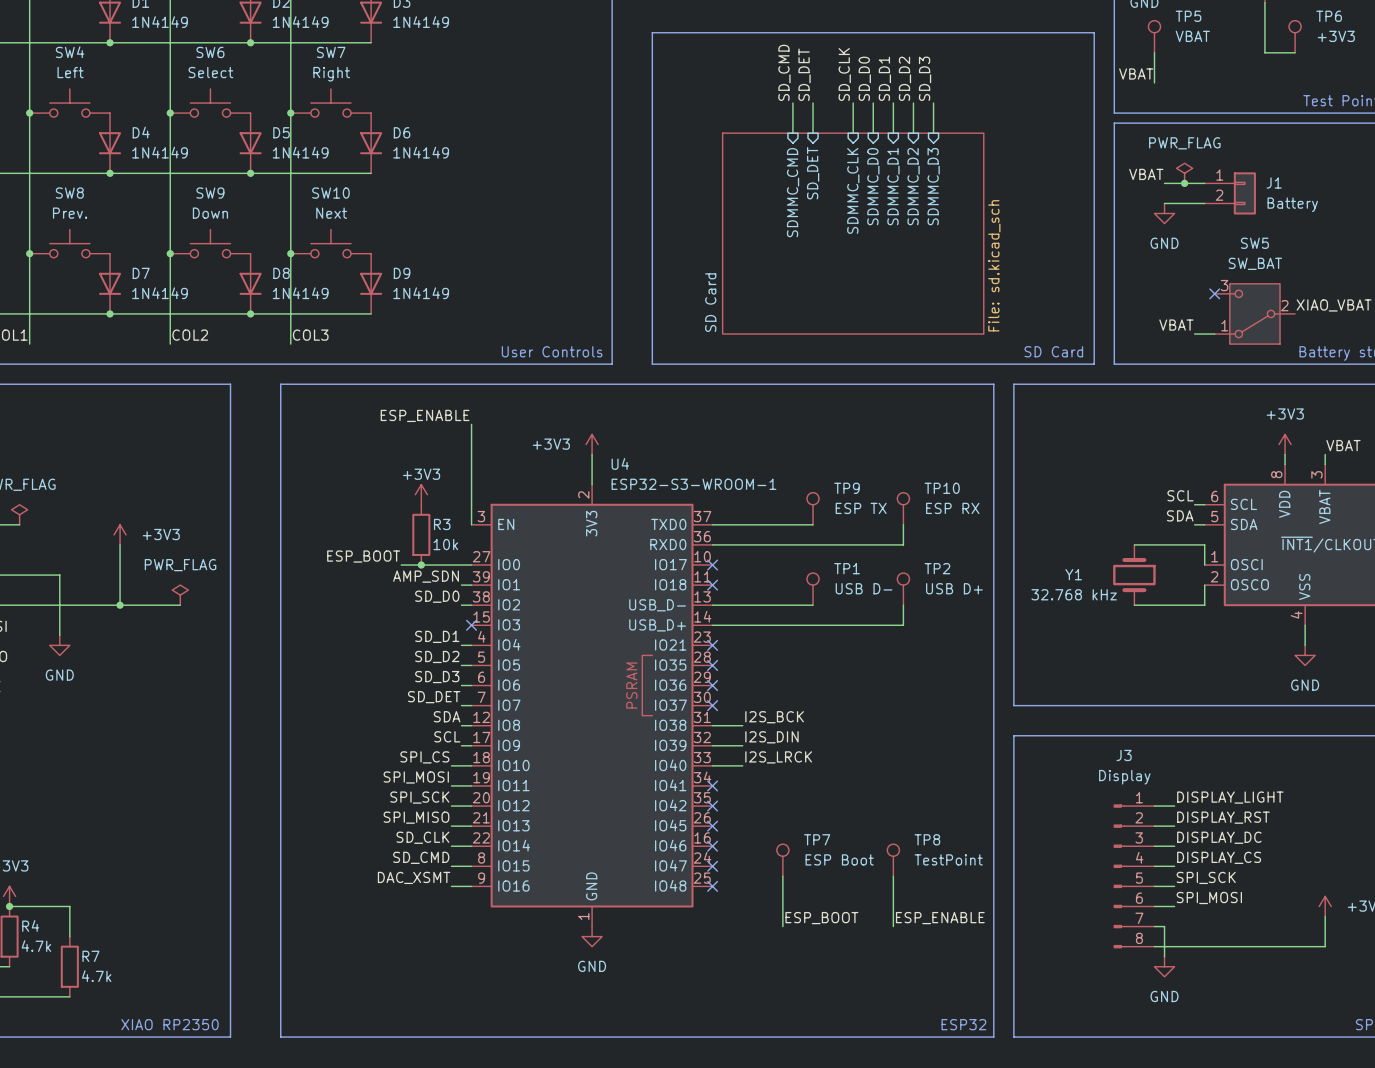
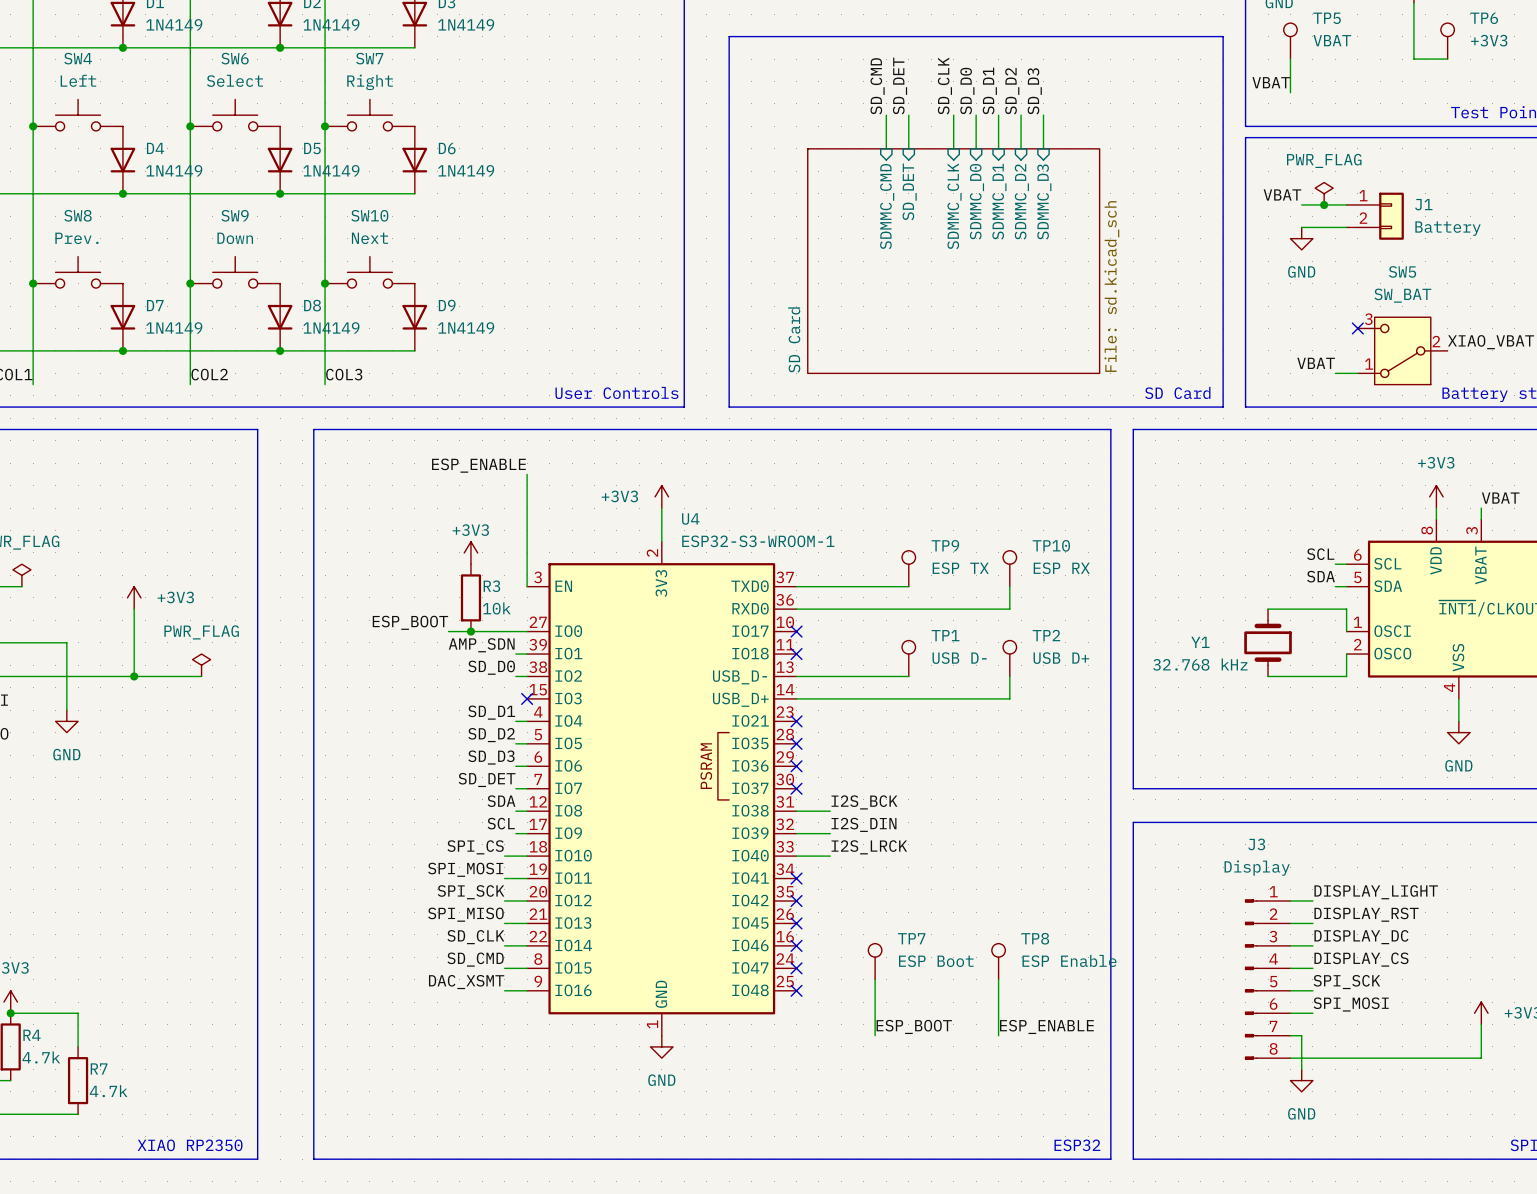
TP8 value: TestPoint (948, 859) -> ESP Enable (1069, 960)

